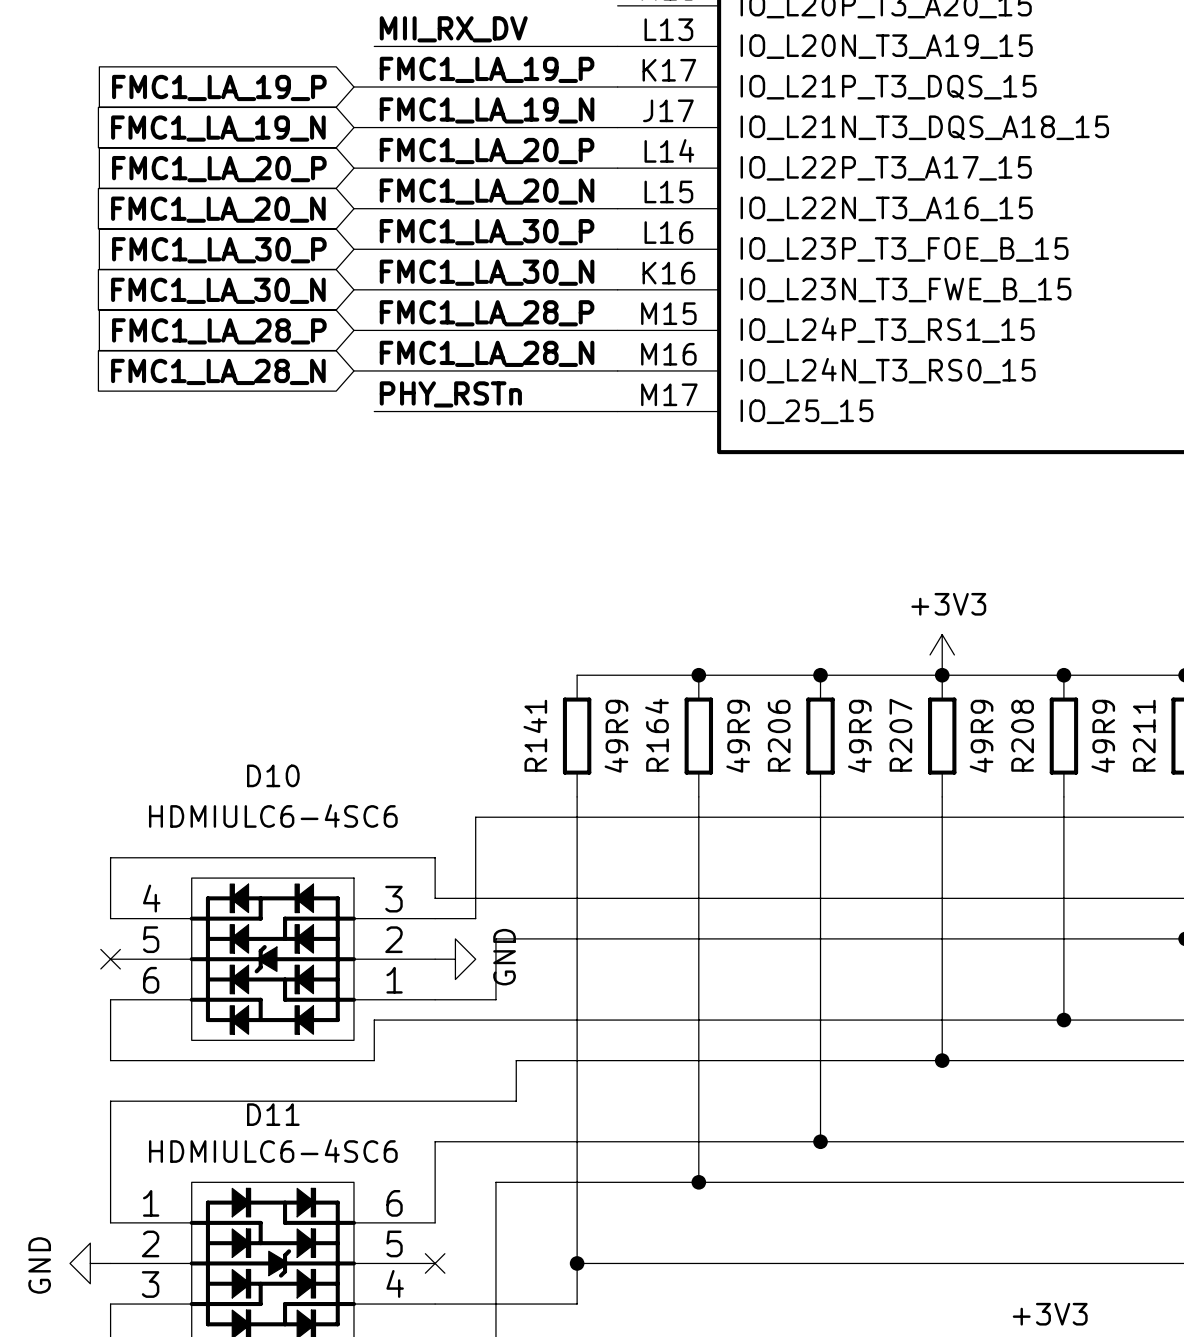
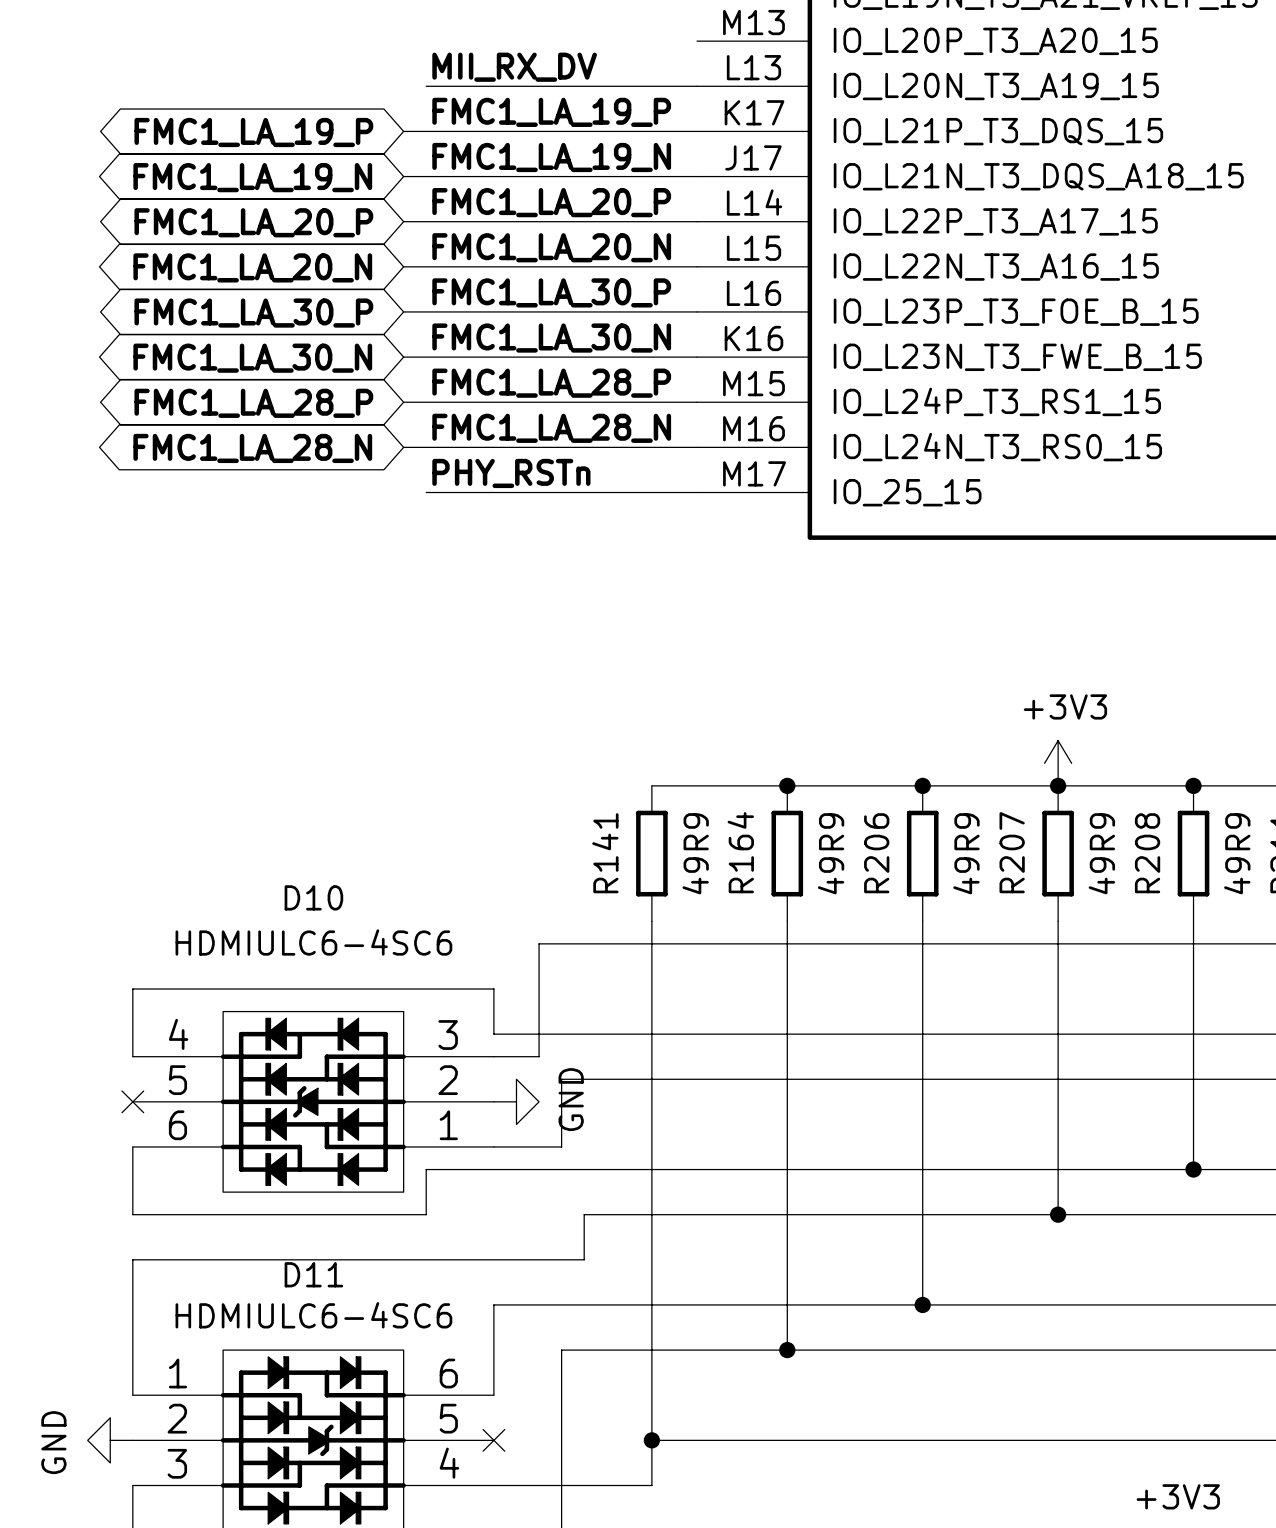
global label shape: input (219, 87) -> bidirectional (253, 132)
global label shape: input (218, 128) -> bidirectional (252, 177)
global label shape: input (219, 169) -> bidirectional (253, 222)
global label shape: input (218, 209) -> bidirectional (252, 267)
global label shape: input (219, 250) -> bidirectional (253, 313)
global label shape: input (218, 290) -> bidirectional (252, 358)
global label shape: input (219, 331) -> bidirectional (253, 403)
global label shape: input (218, 371) -> bidirectional (252, 448)

